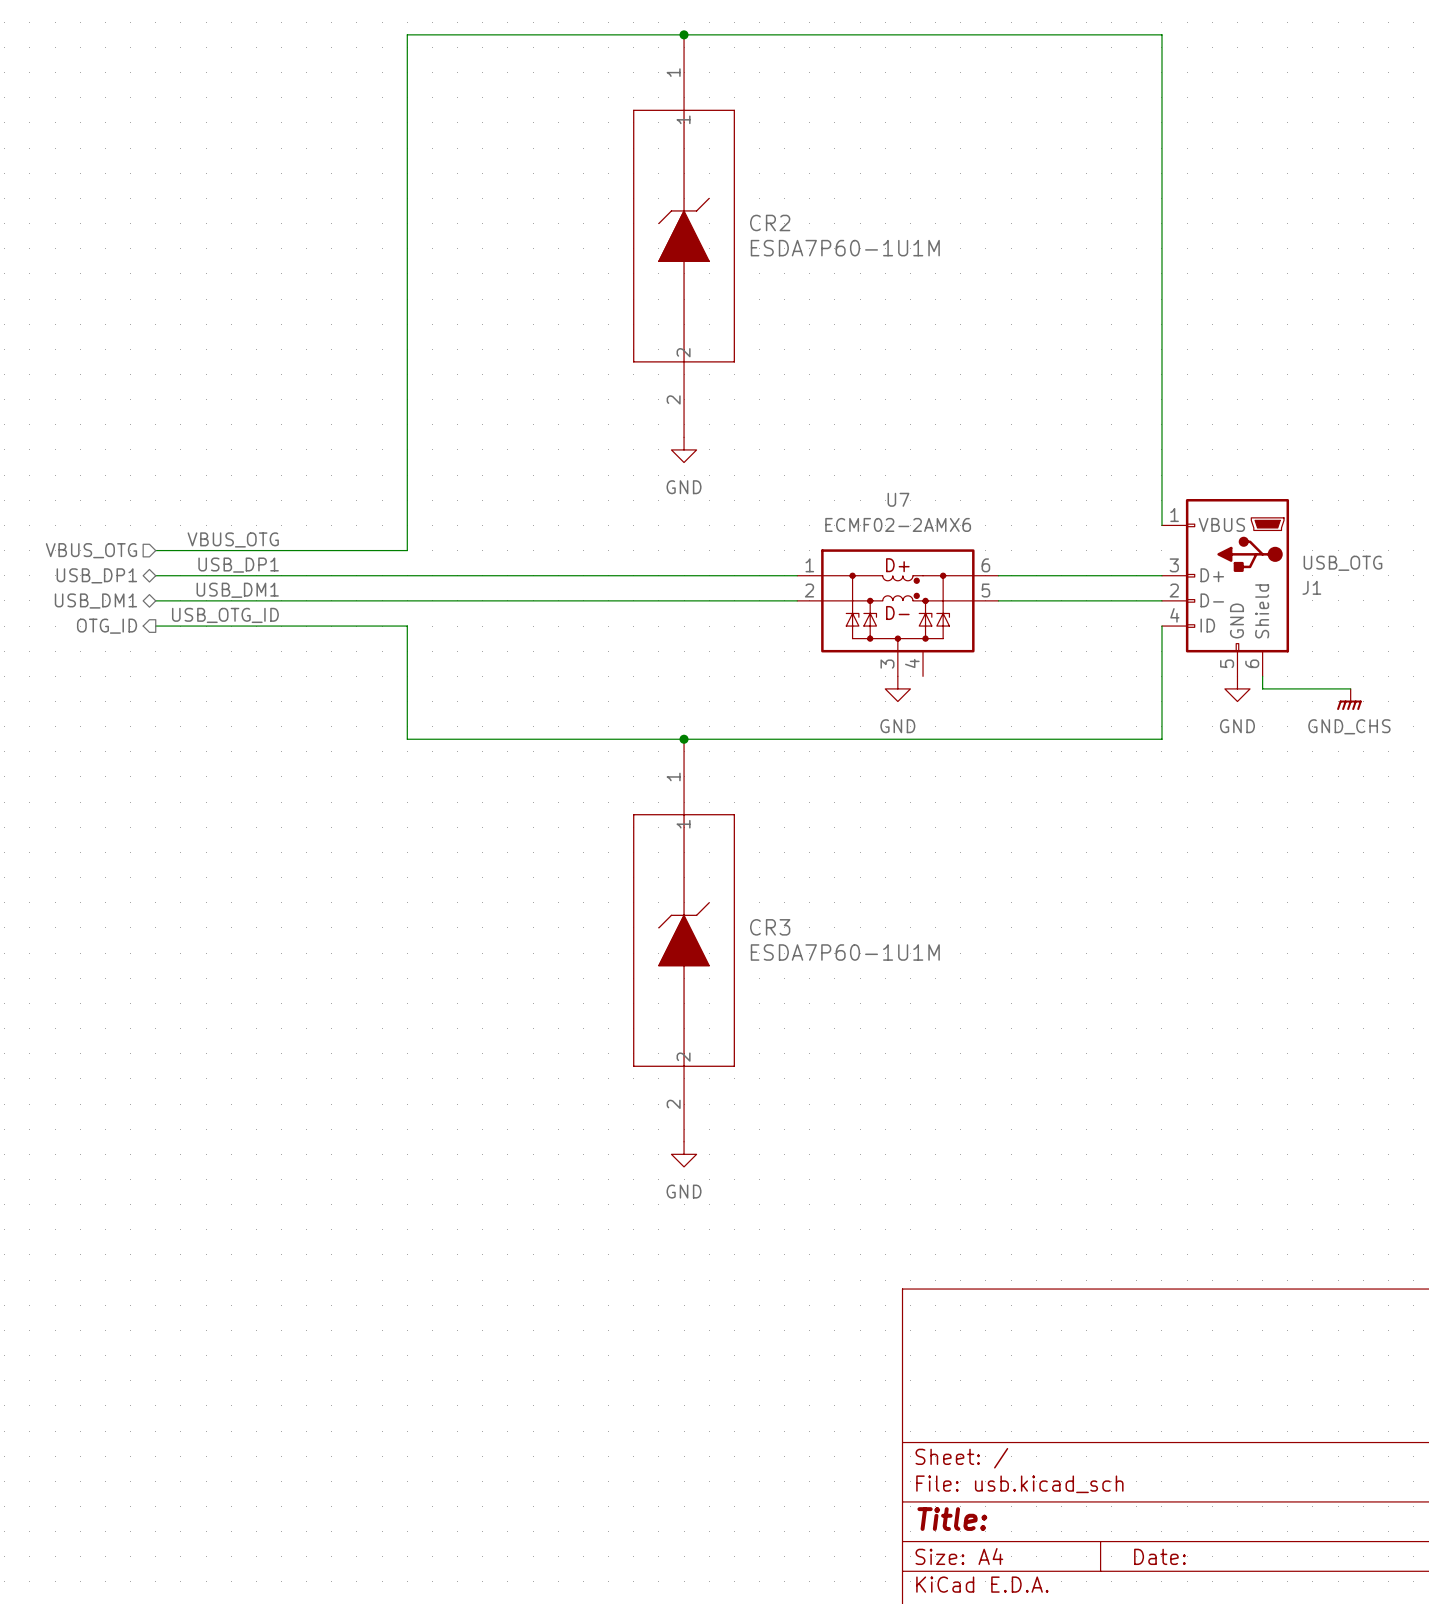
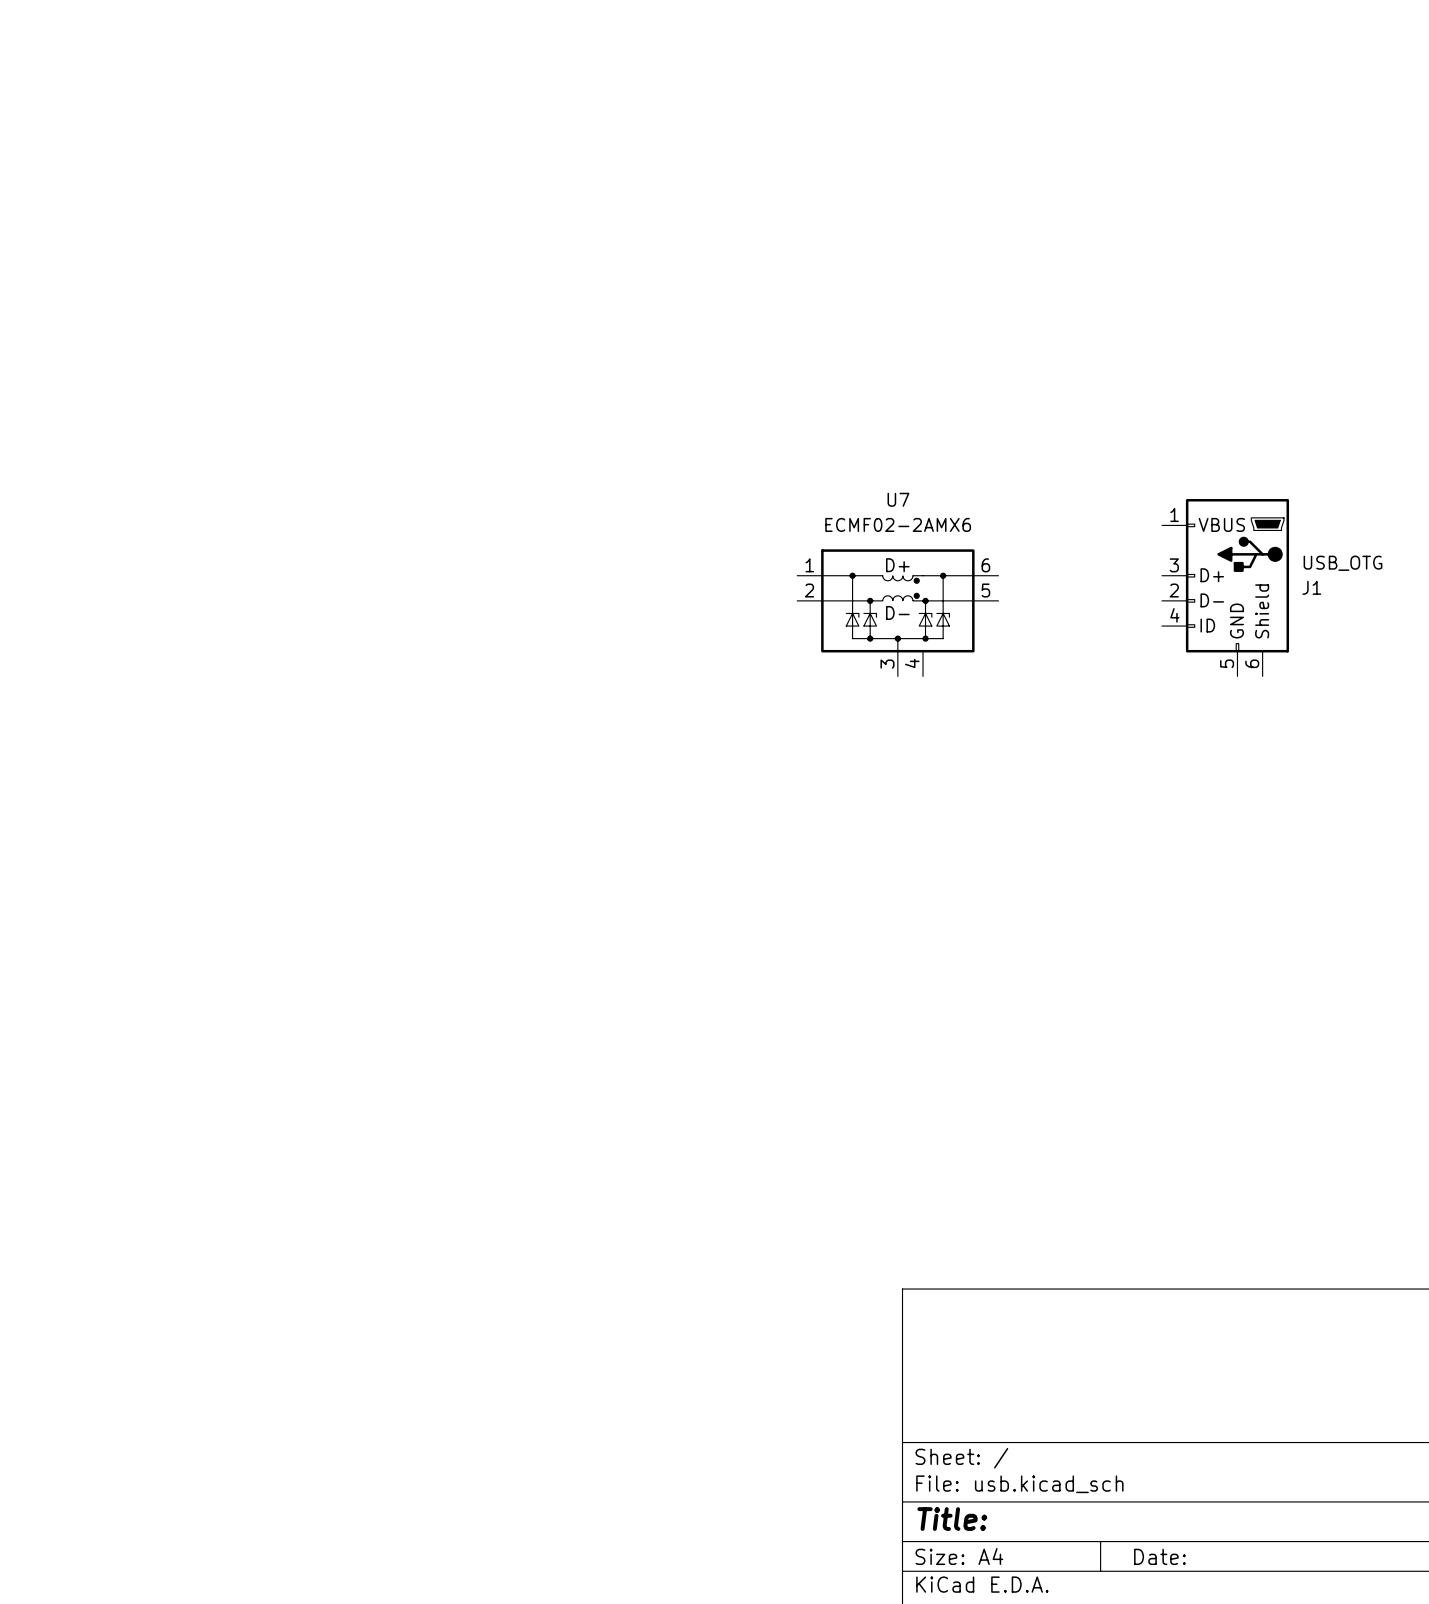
junction: (684, 34) -> none
CR2: ESDA7P60-1U1M (684, 236) -> none
power symbol: GND (684, 449) -> none
wire: (1161, 525) (1161, 34) (407, 34) (407, 550) (155, 550) -> none
label: VBUS_OTG (233, 539) -> none
hierarchical label: VBUS_OTG (91, 550) -> none
label: USB_DP1 (238, 565) -> none
hierarchical label: USB_DP1 (96, 575) -> none
wire: (155, 575) (797, 575) -> none
wire: (998, 575) (1161, 575) -> none
label: USB_DM1 (237, 590) -> none
wire: (155, 600) (797, 600) -> none
wire: (998, 600) (1161, 600) -> none
hierarchical label: USB_DM1 (95, 601) -> none
label: USB_OTG_ID (225, 615) -> none
hierarchical label: OTG_ID (107, 626) -> none
wire: (155, 626) (407, 626) (407, 739) (1161, 739) (1161, 626) -> none
wire: (1262, 676) (1262, 688) (1350, 688) -> none
power symbol: GND (897, 688) -> none
power symbol: GND (1237, 688) -> none
power symbol: GND_CHS (1349, 699) -> none
junction: (684, 739) -> none
CR3: ESDA7P60-1U1M (684, 940) -> none
power symbol: GND (684, 1154) -> none

